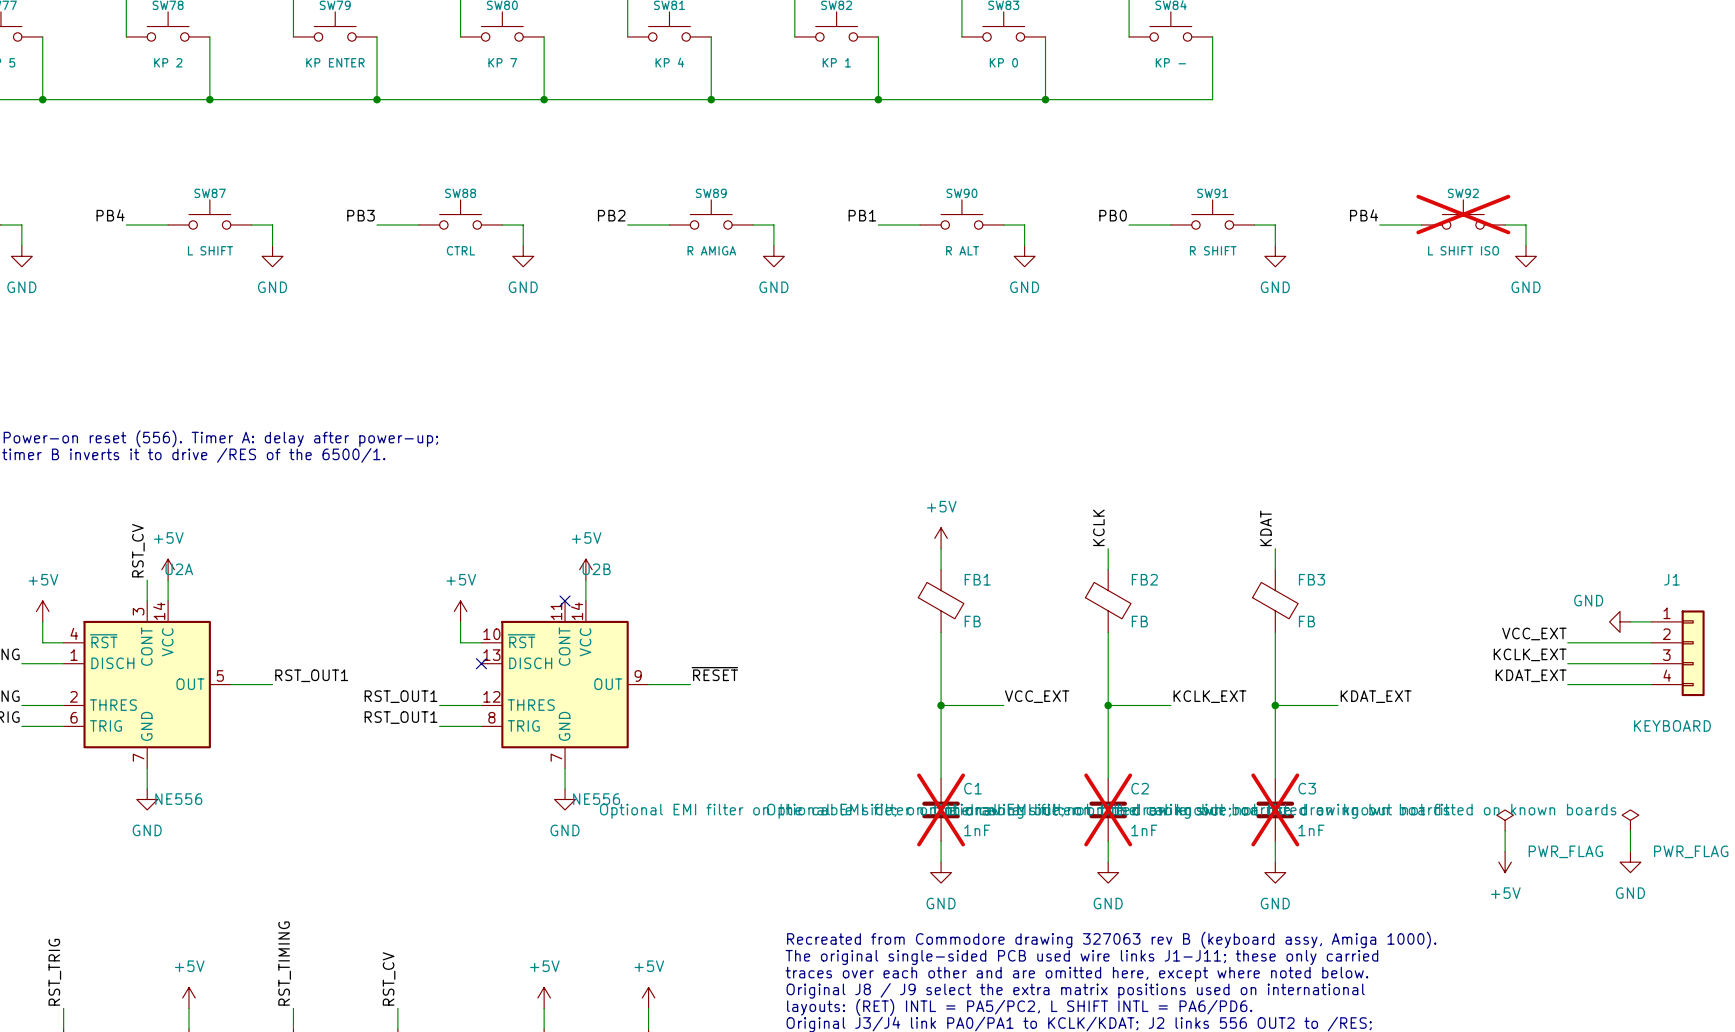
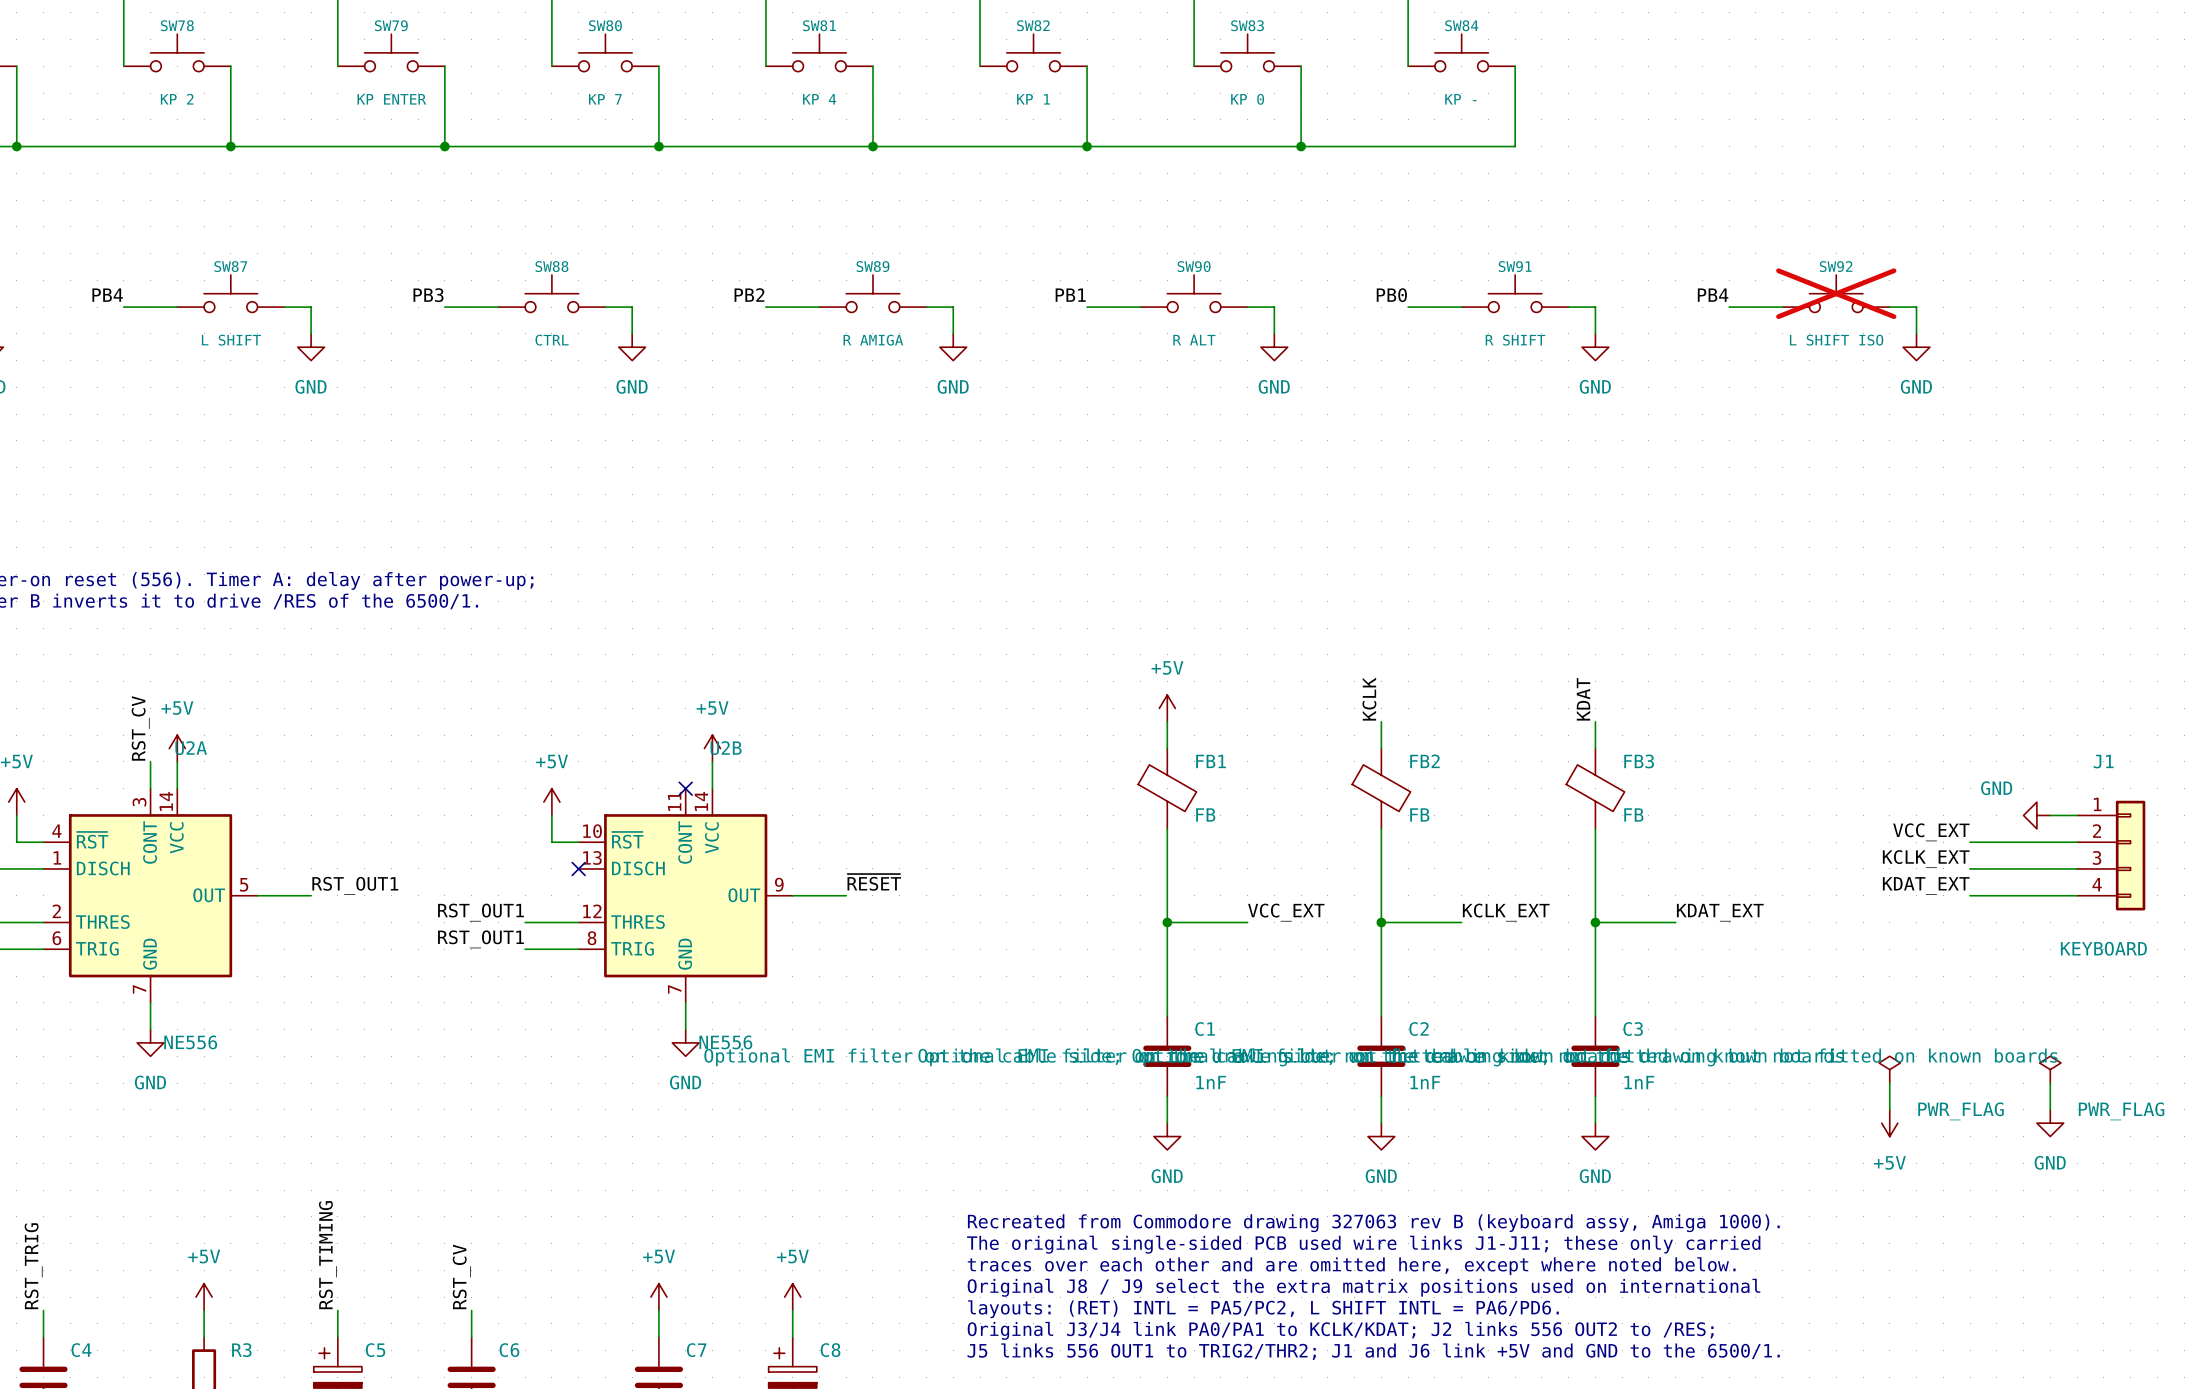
C1 do-not-place cross: (941, 809) -> none
C2 do-not-place cross: (1108, 809) -> none
C3 do-not-place cross: (1275, 809) -> none

